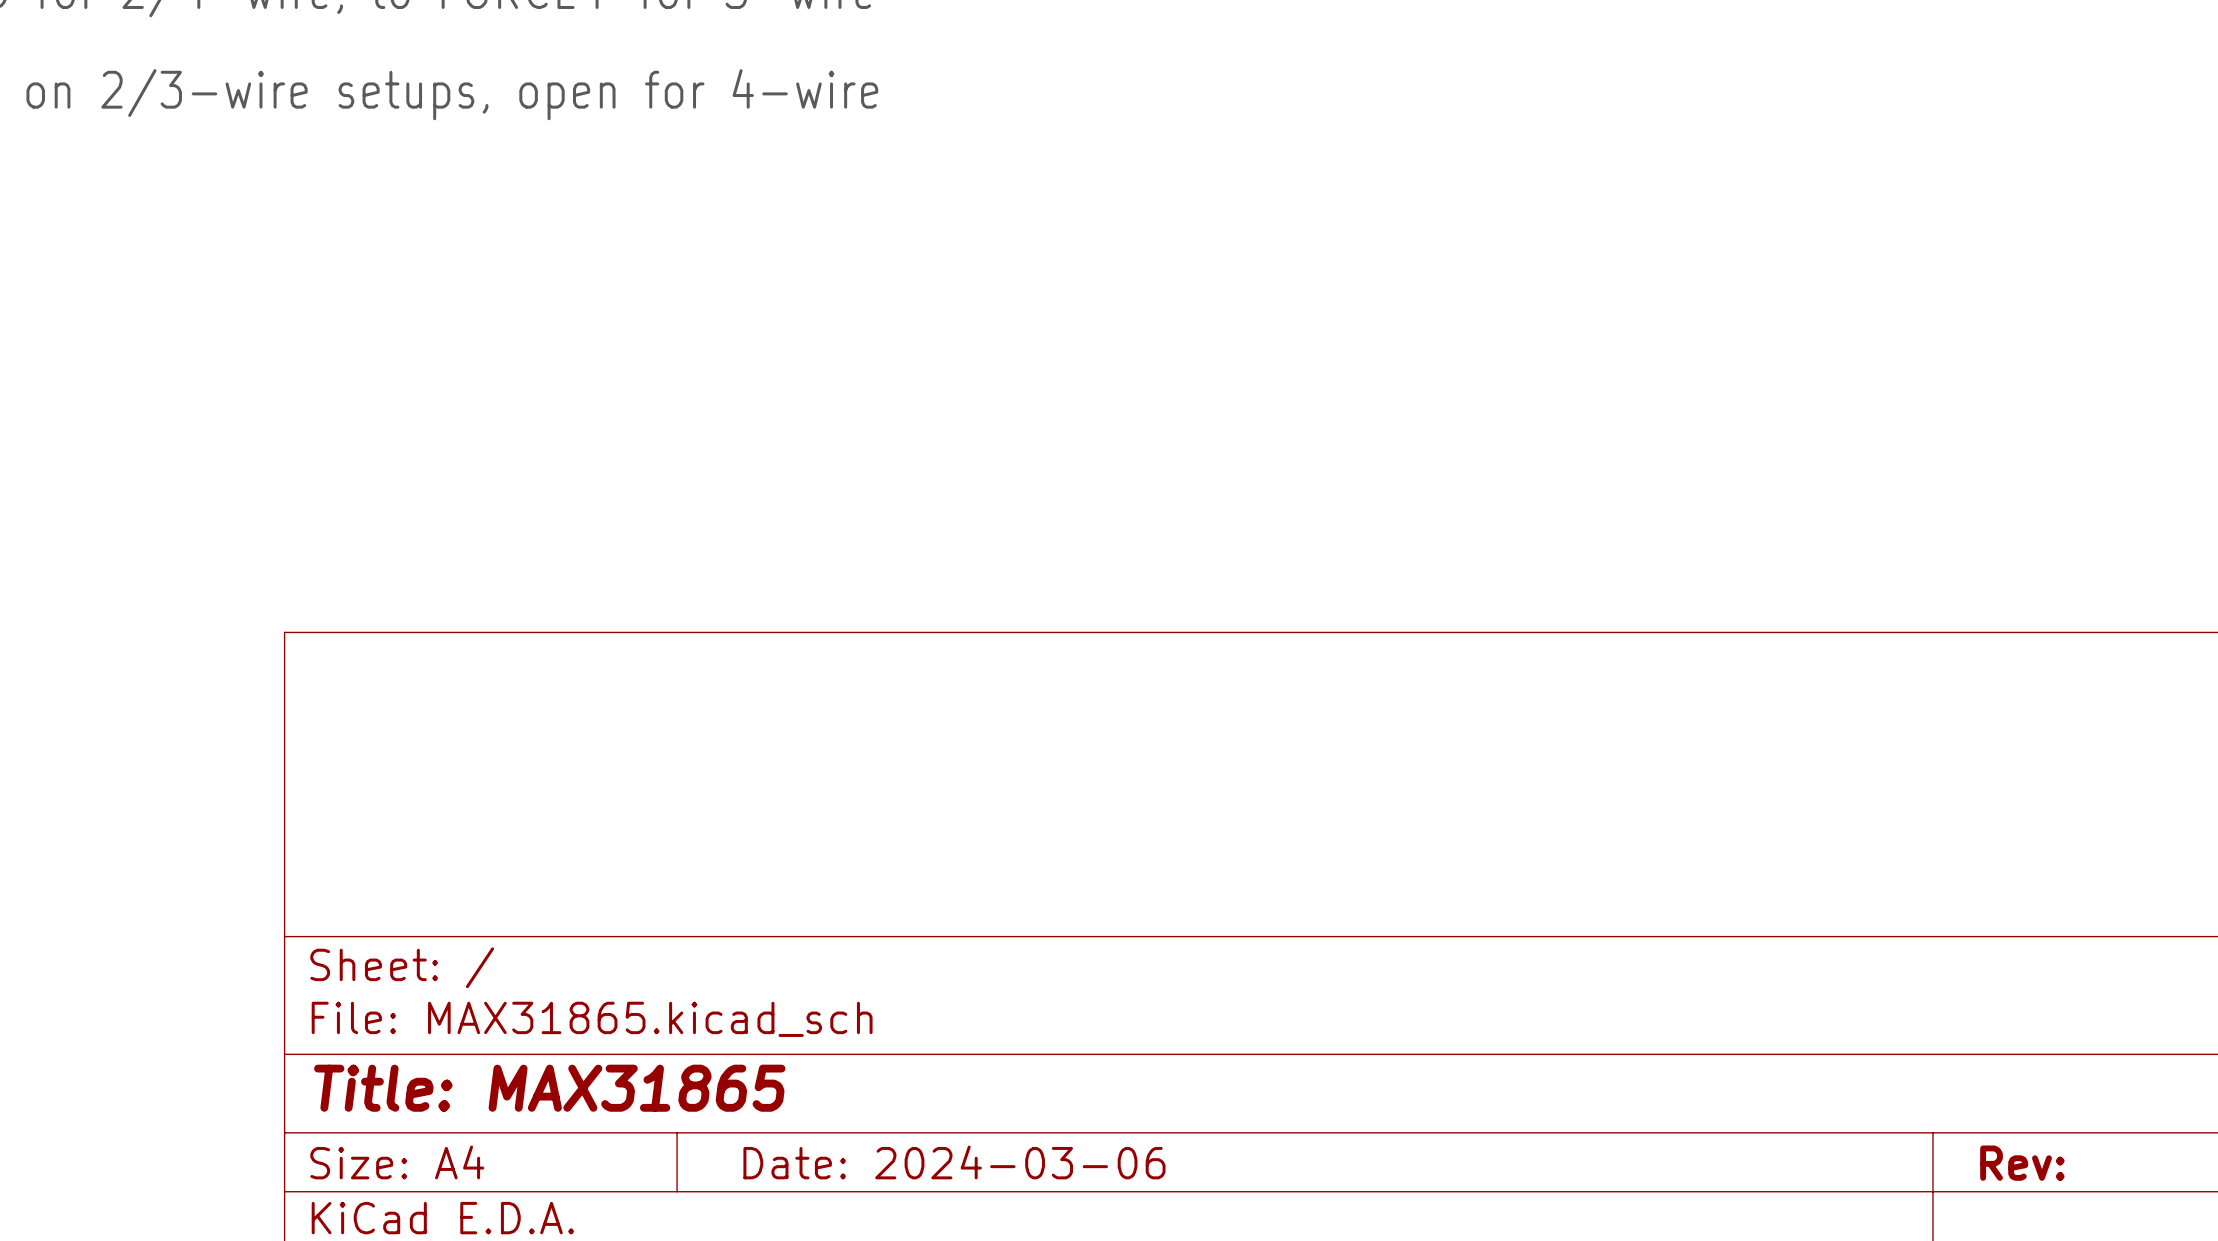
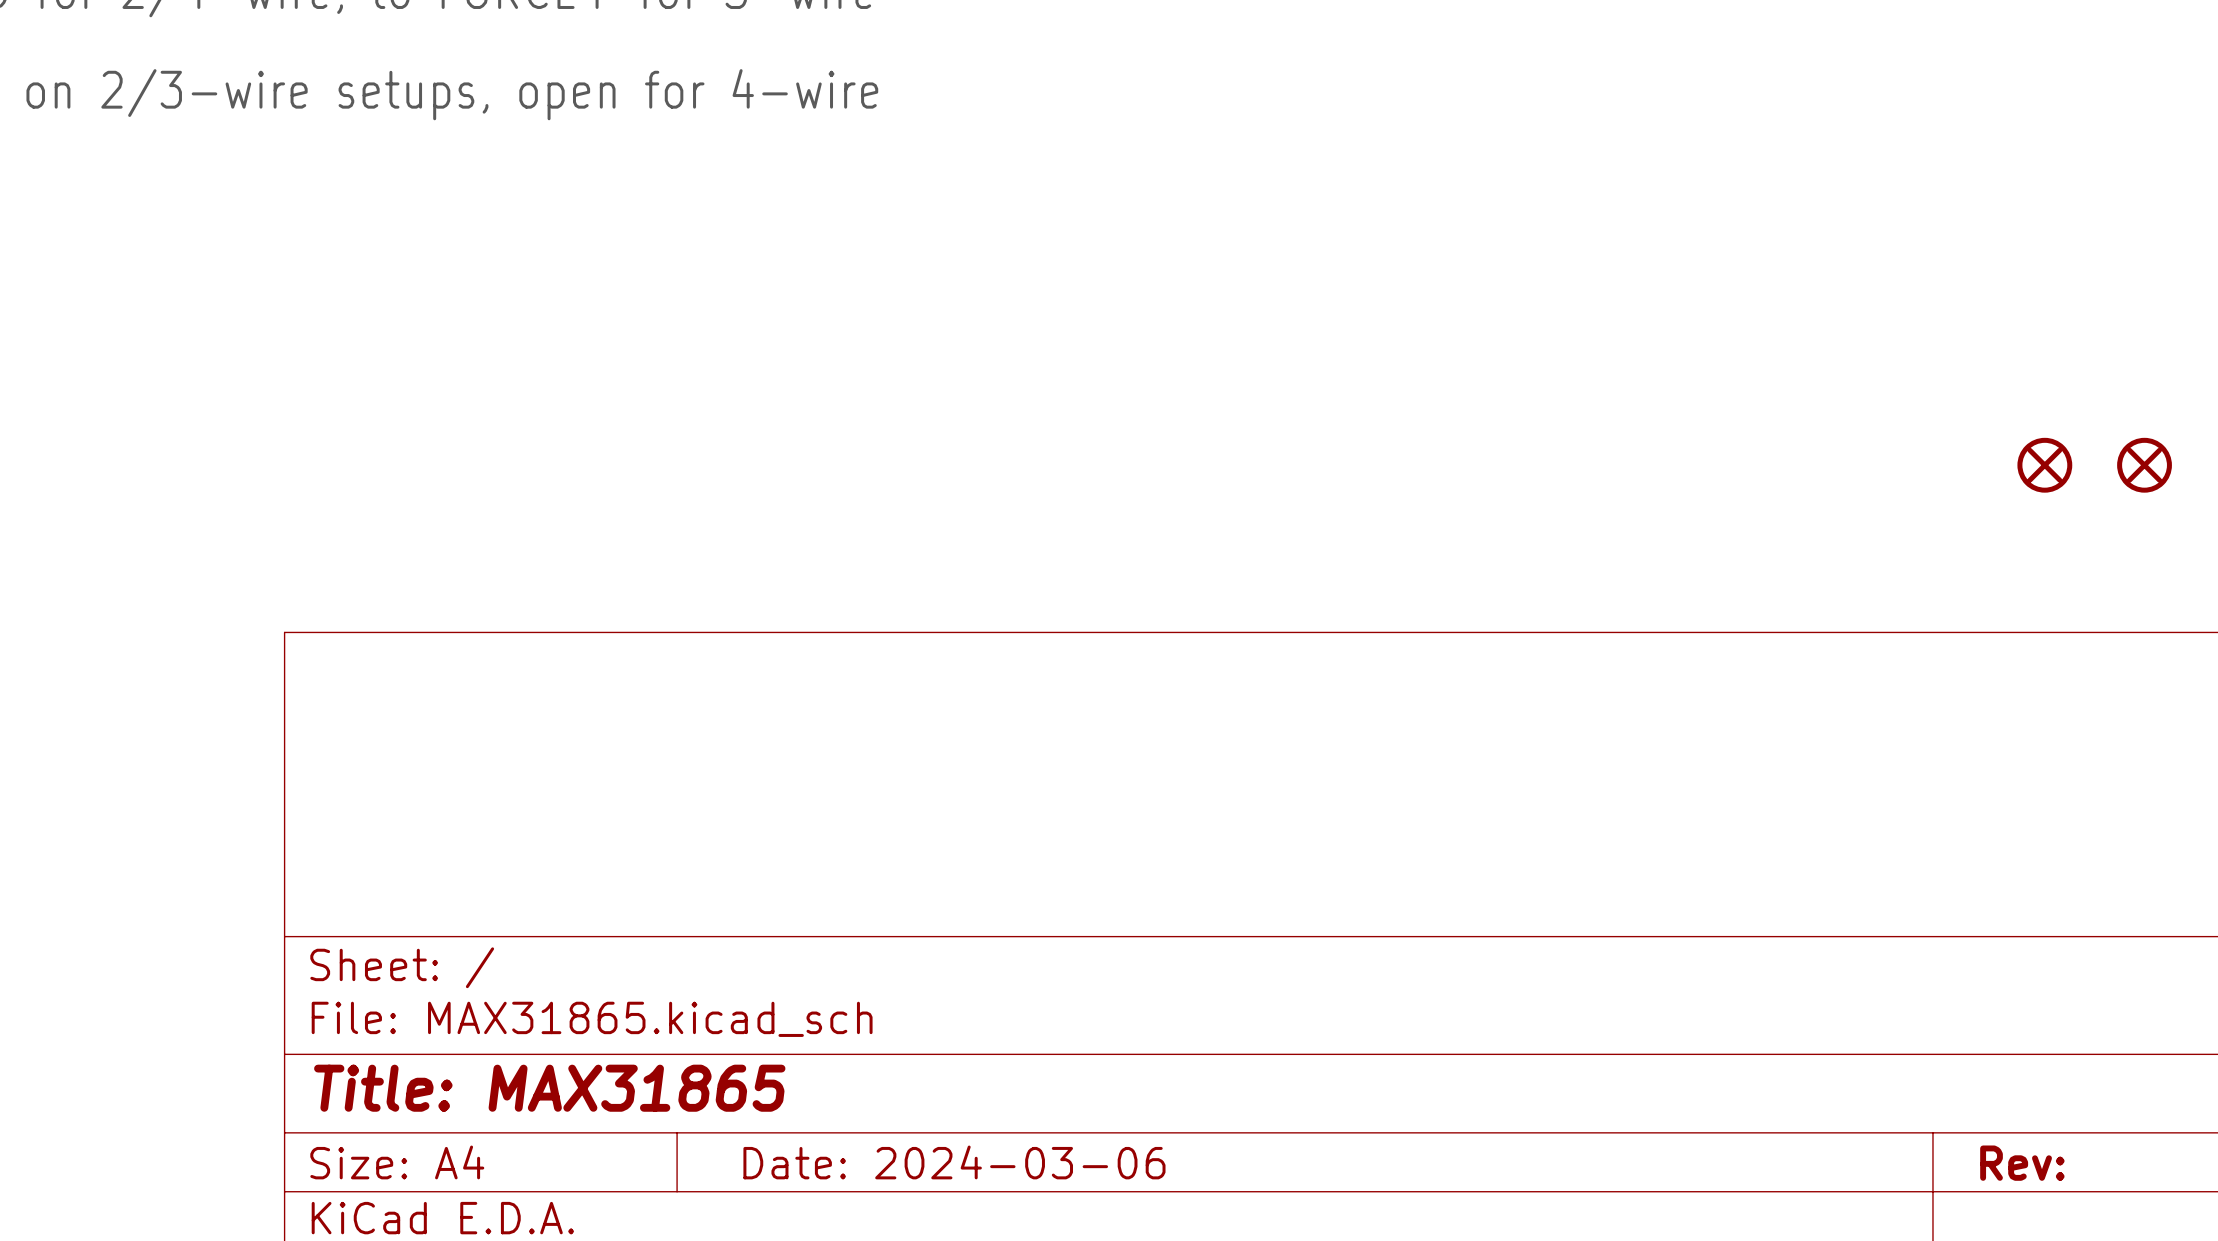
part: none -> (2044, 465)
part: none -> (2144, 465)

